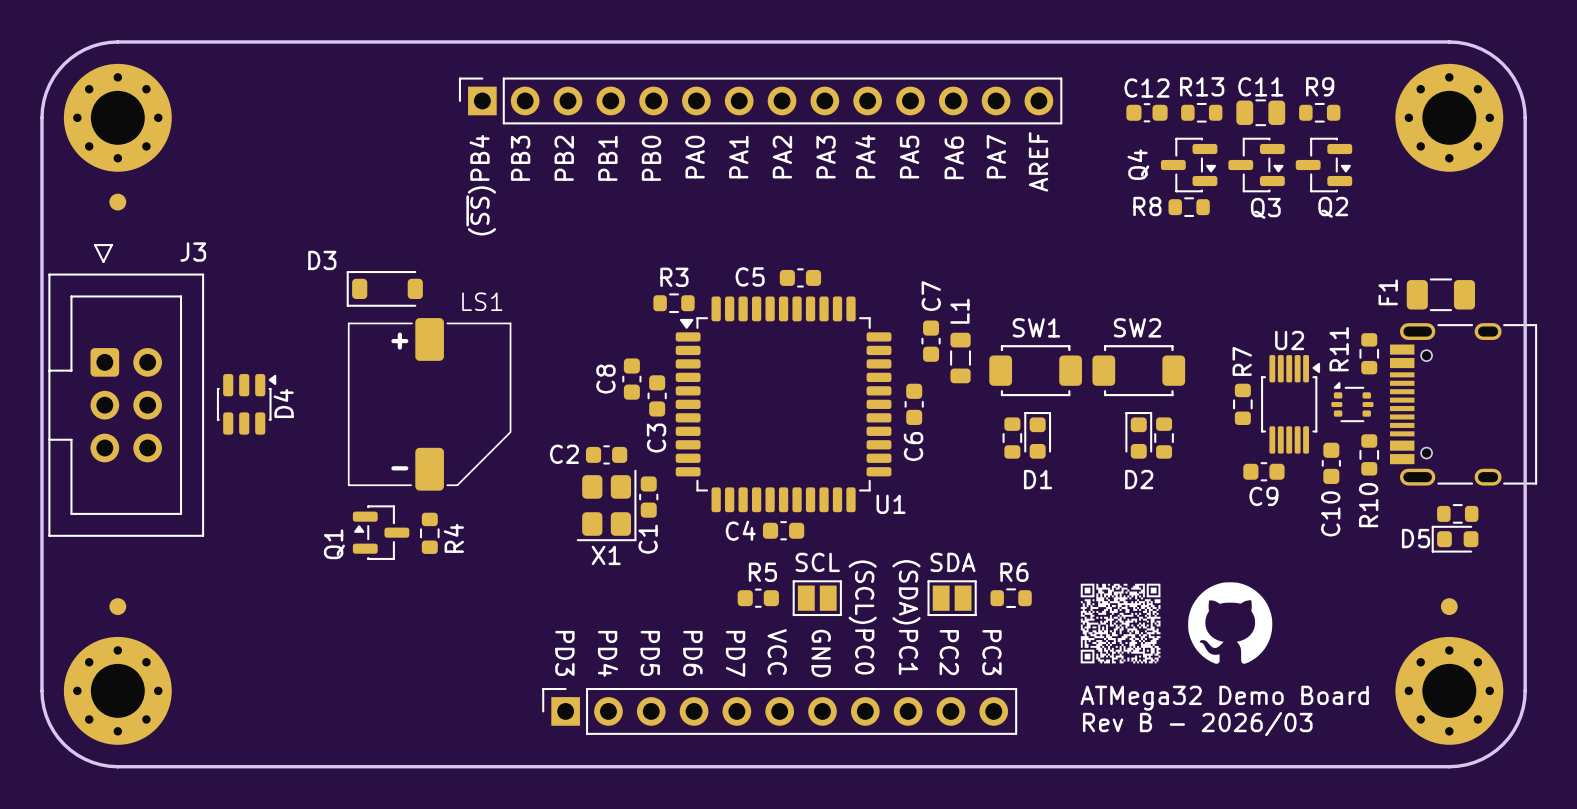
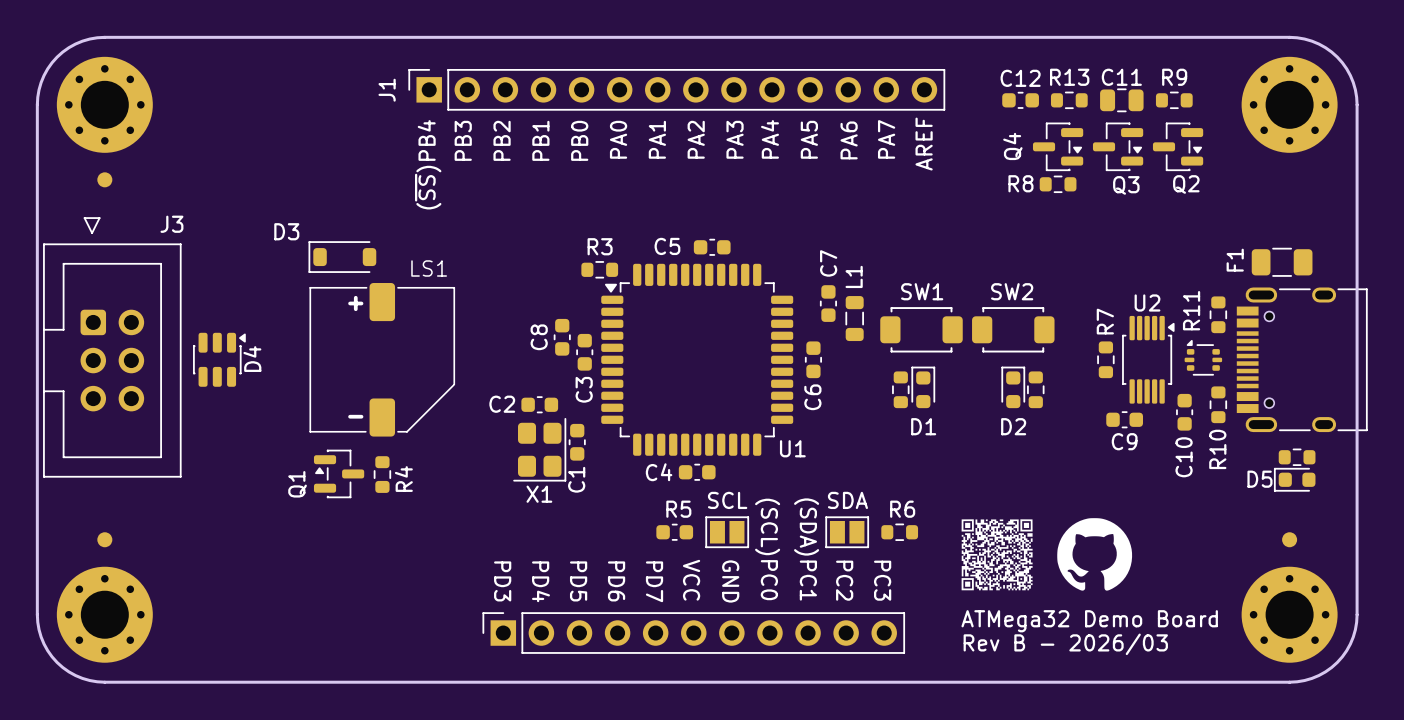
J1 name: none -> J1 (387, 90)

